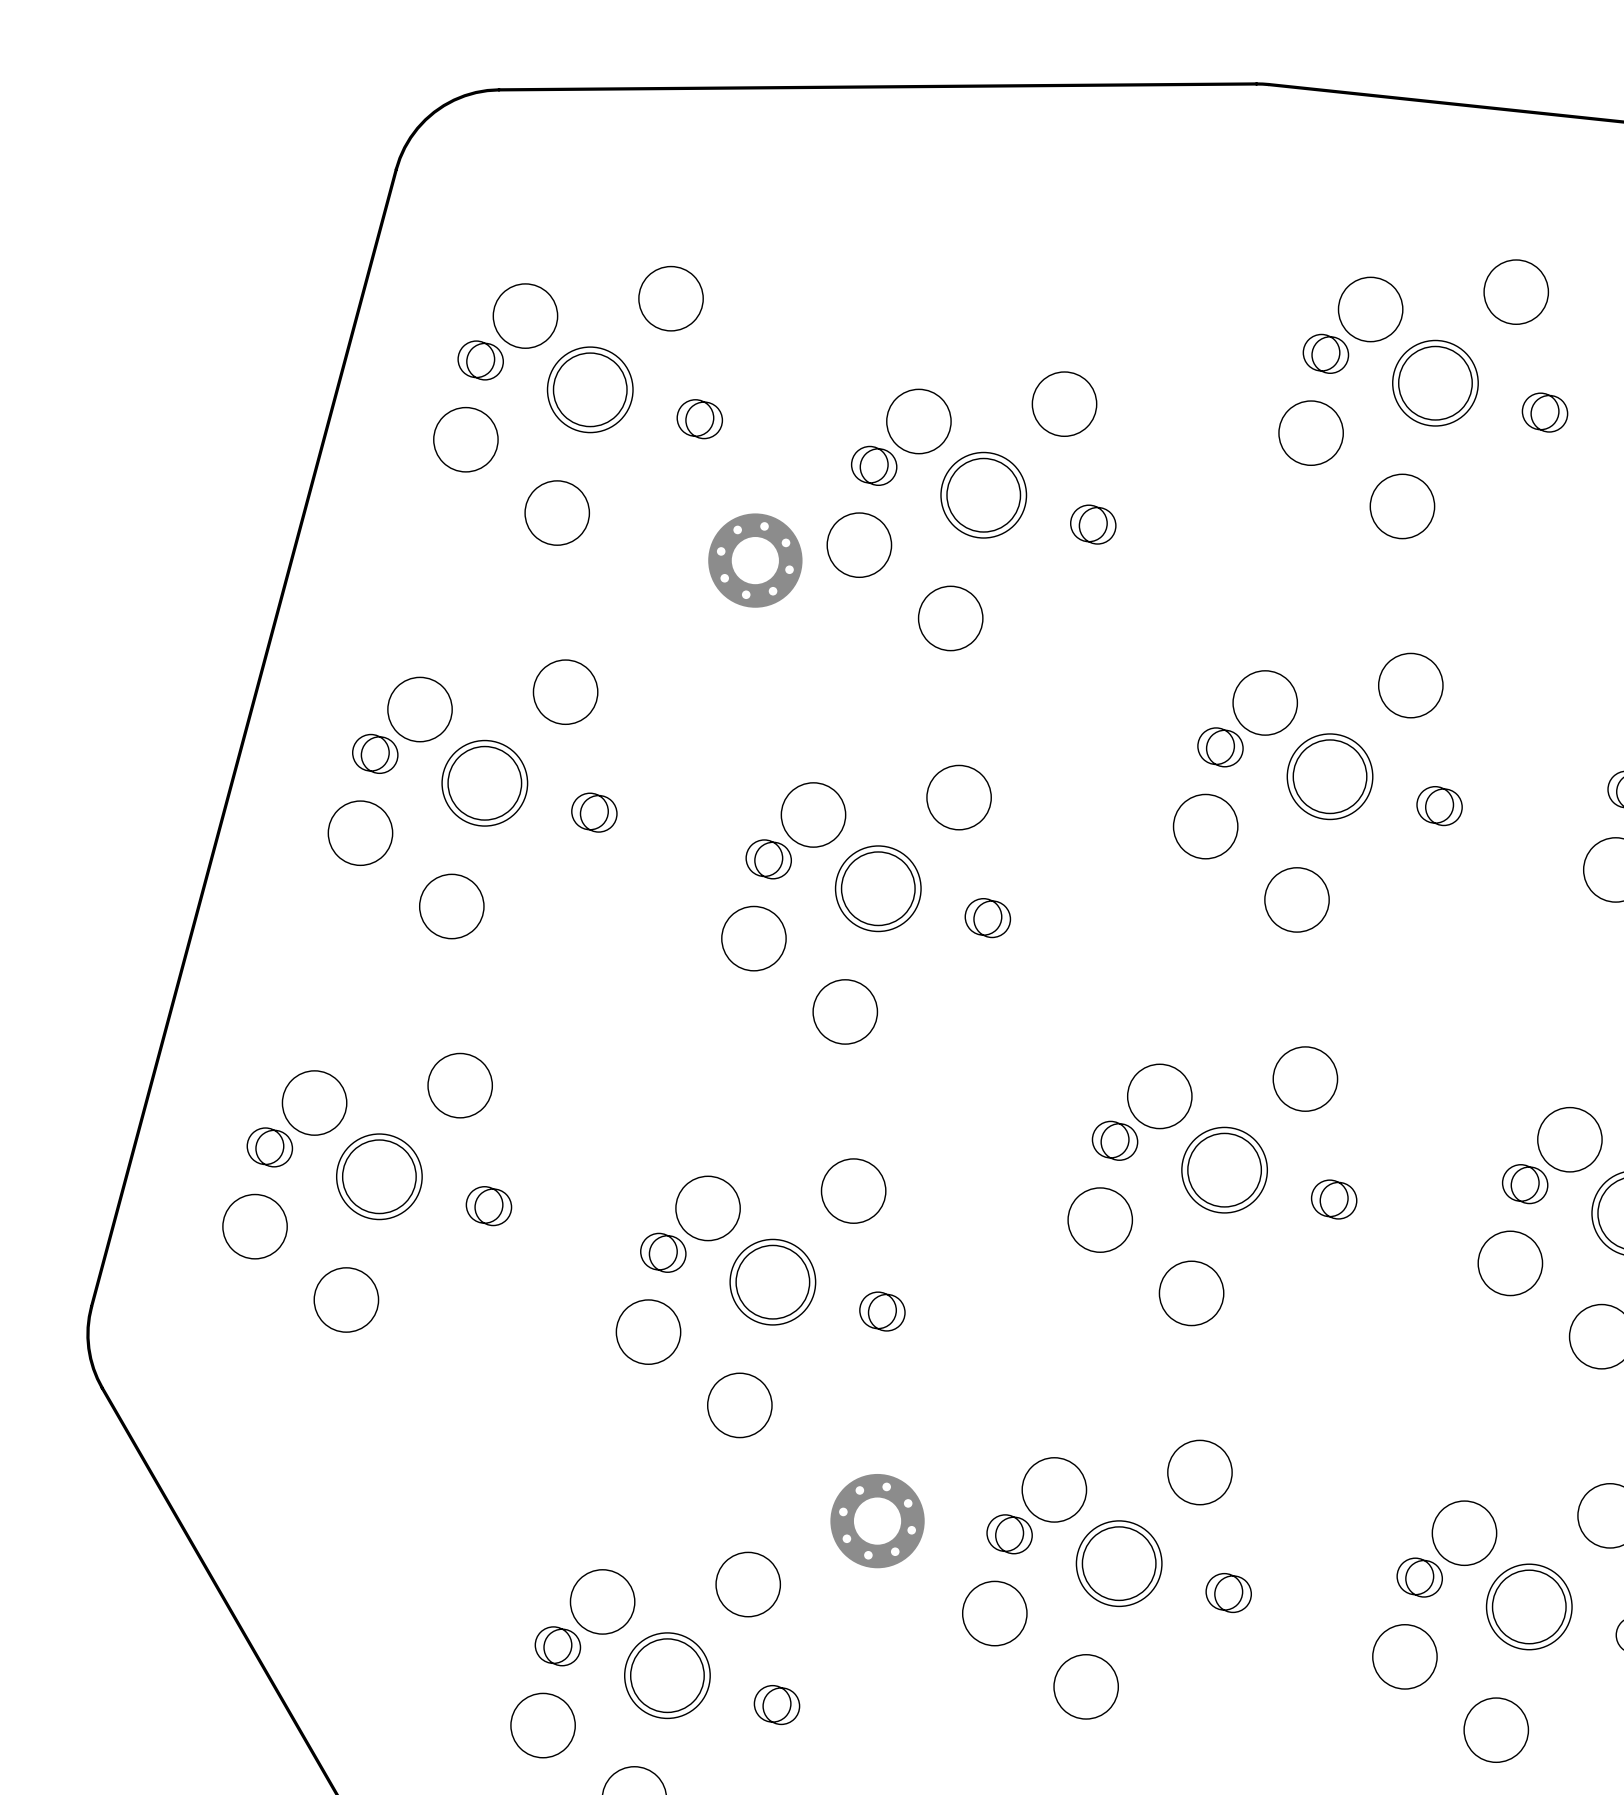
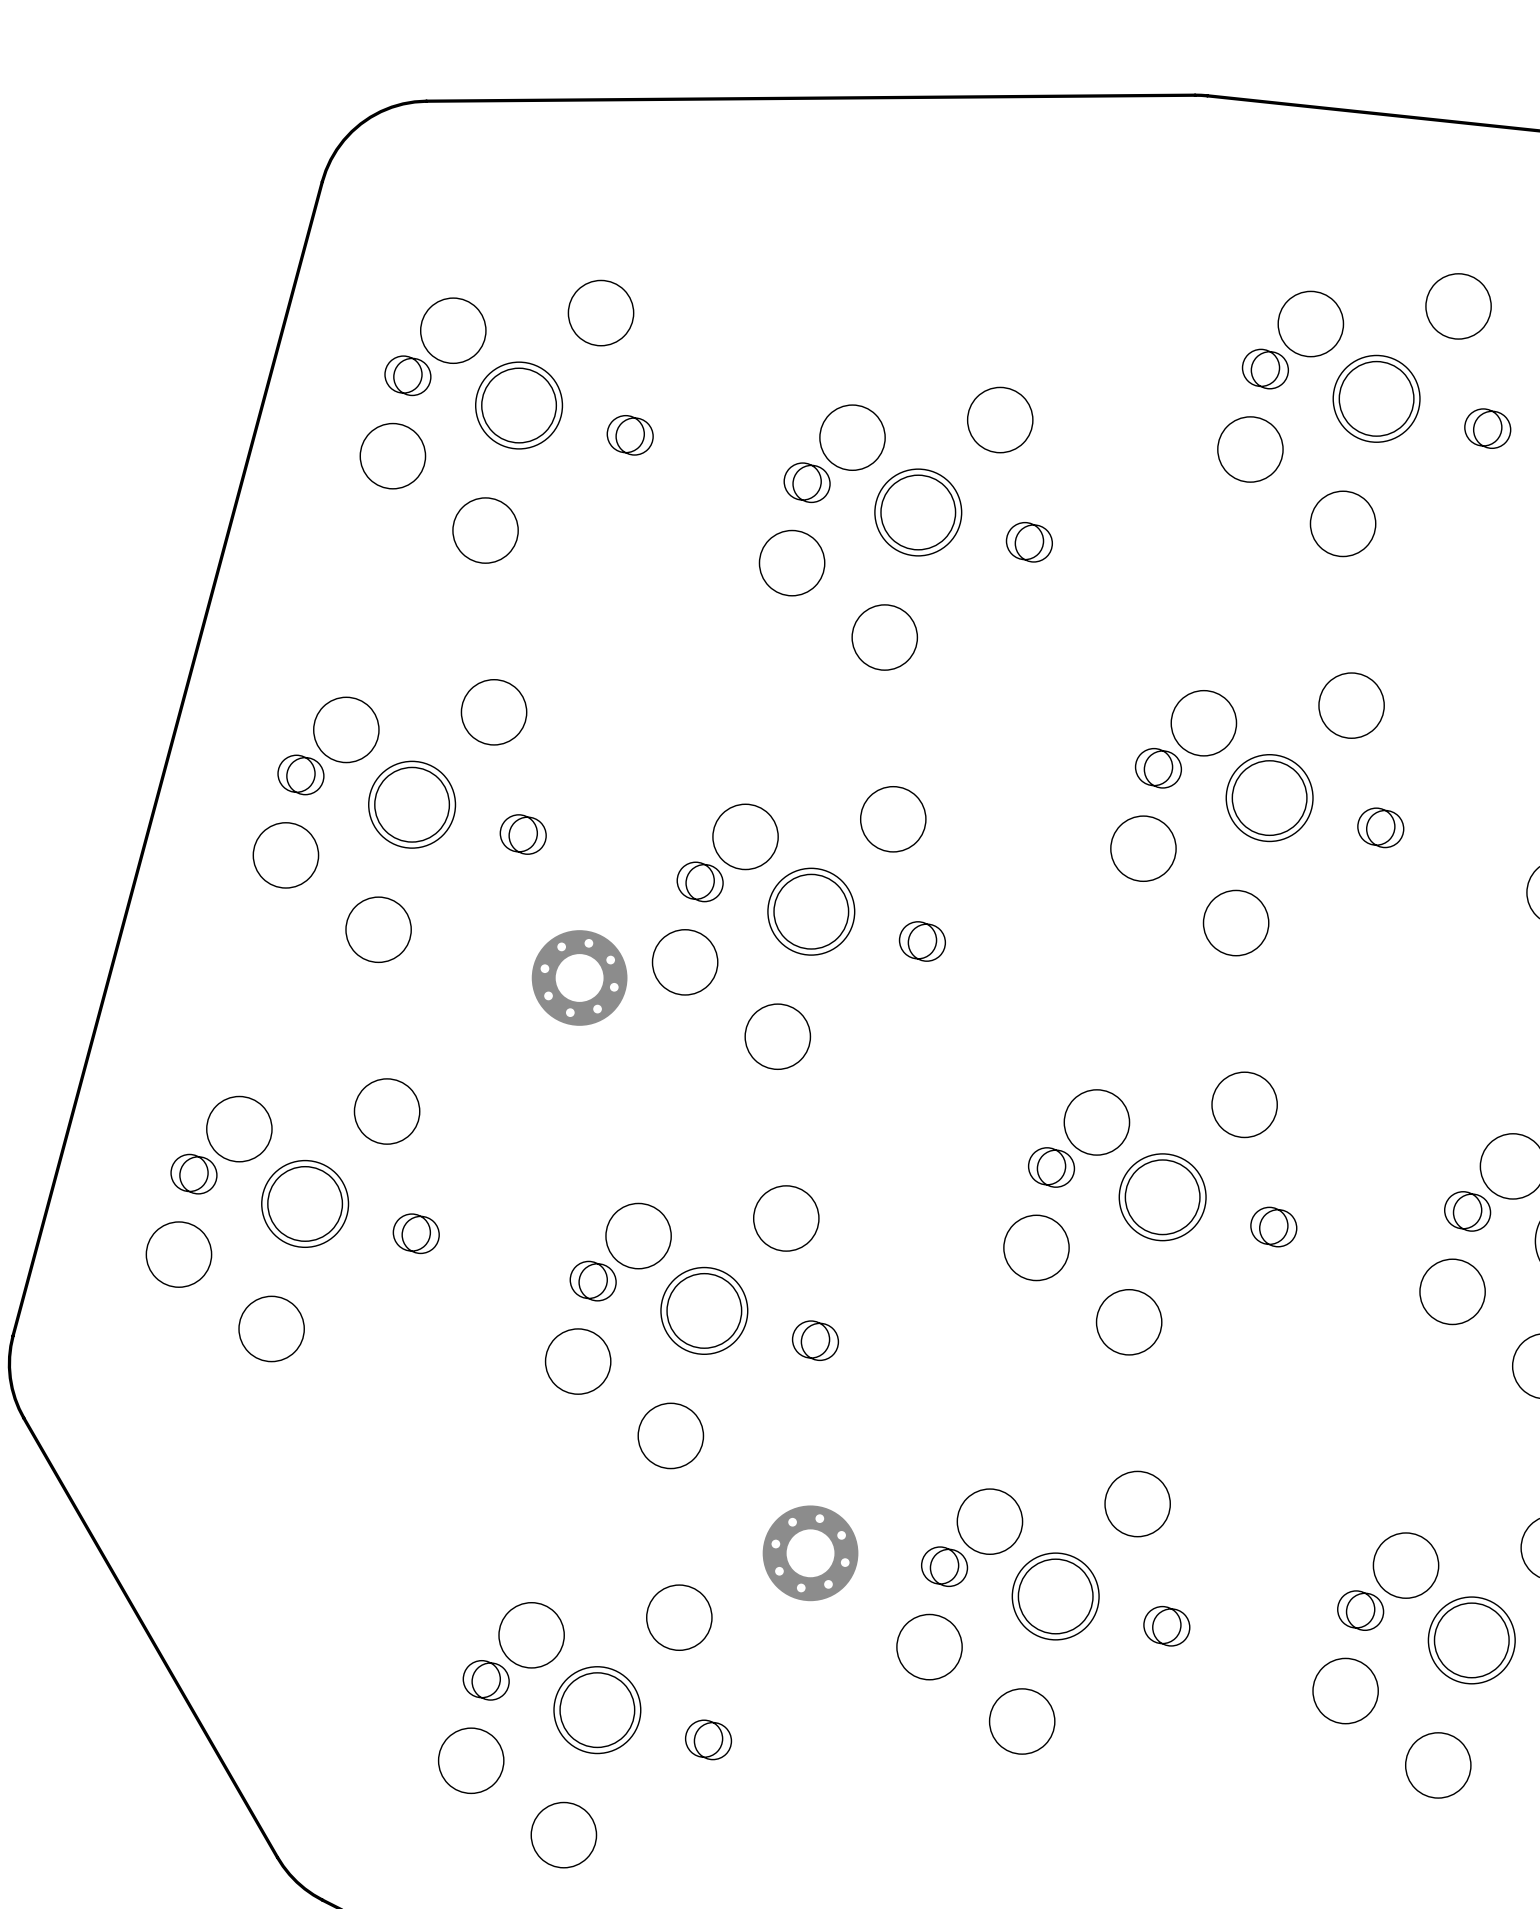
part position: (755, 560) -> (579, 977)

